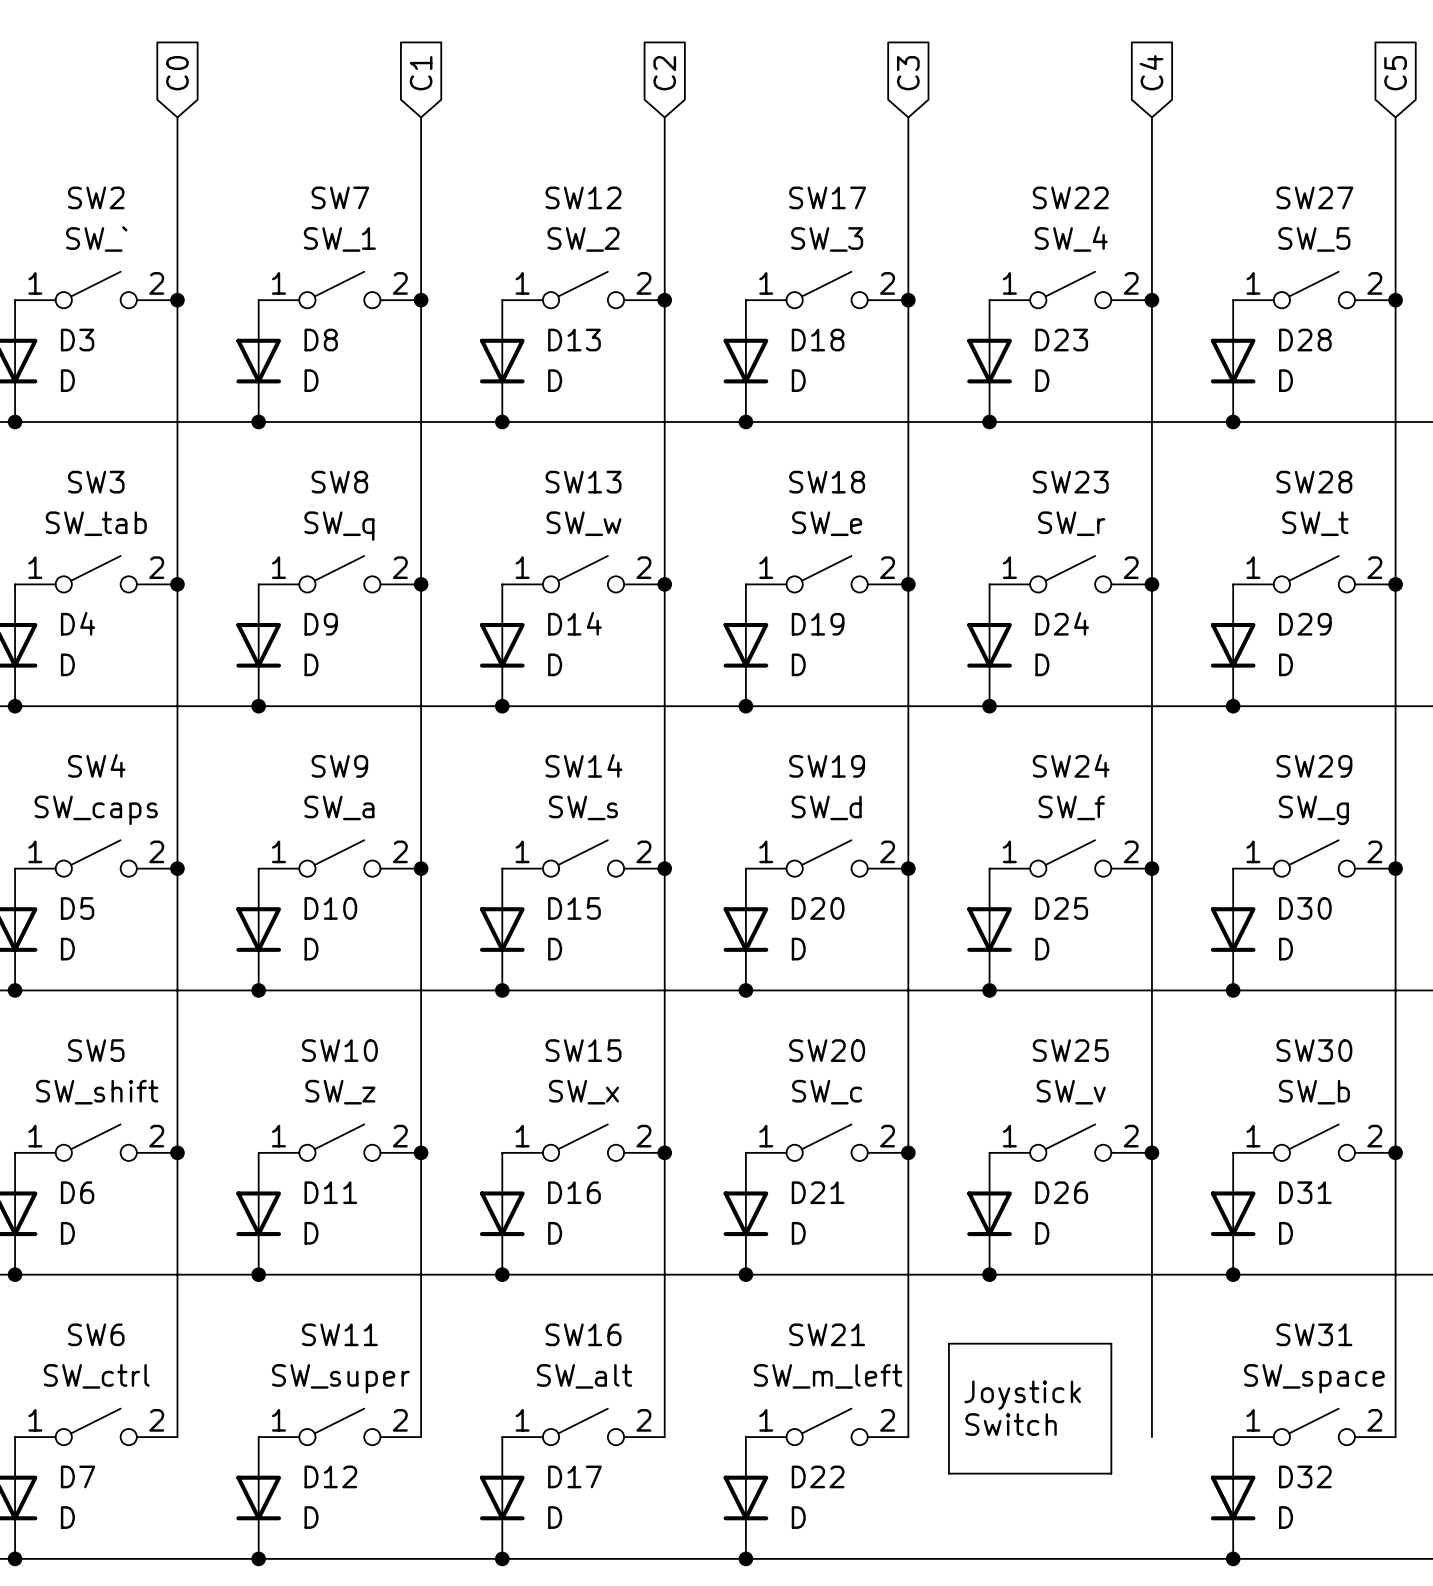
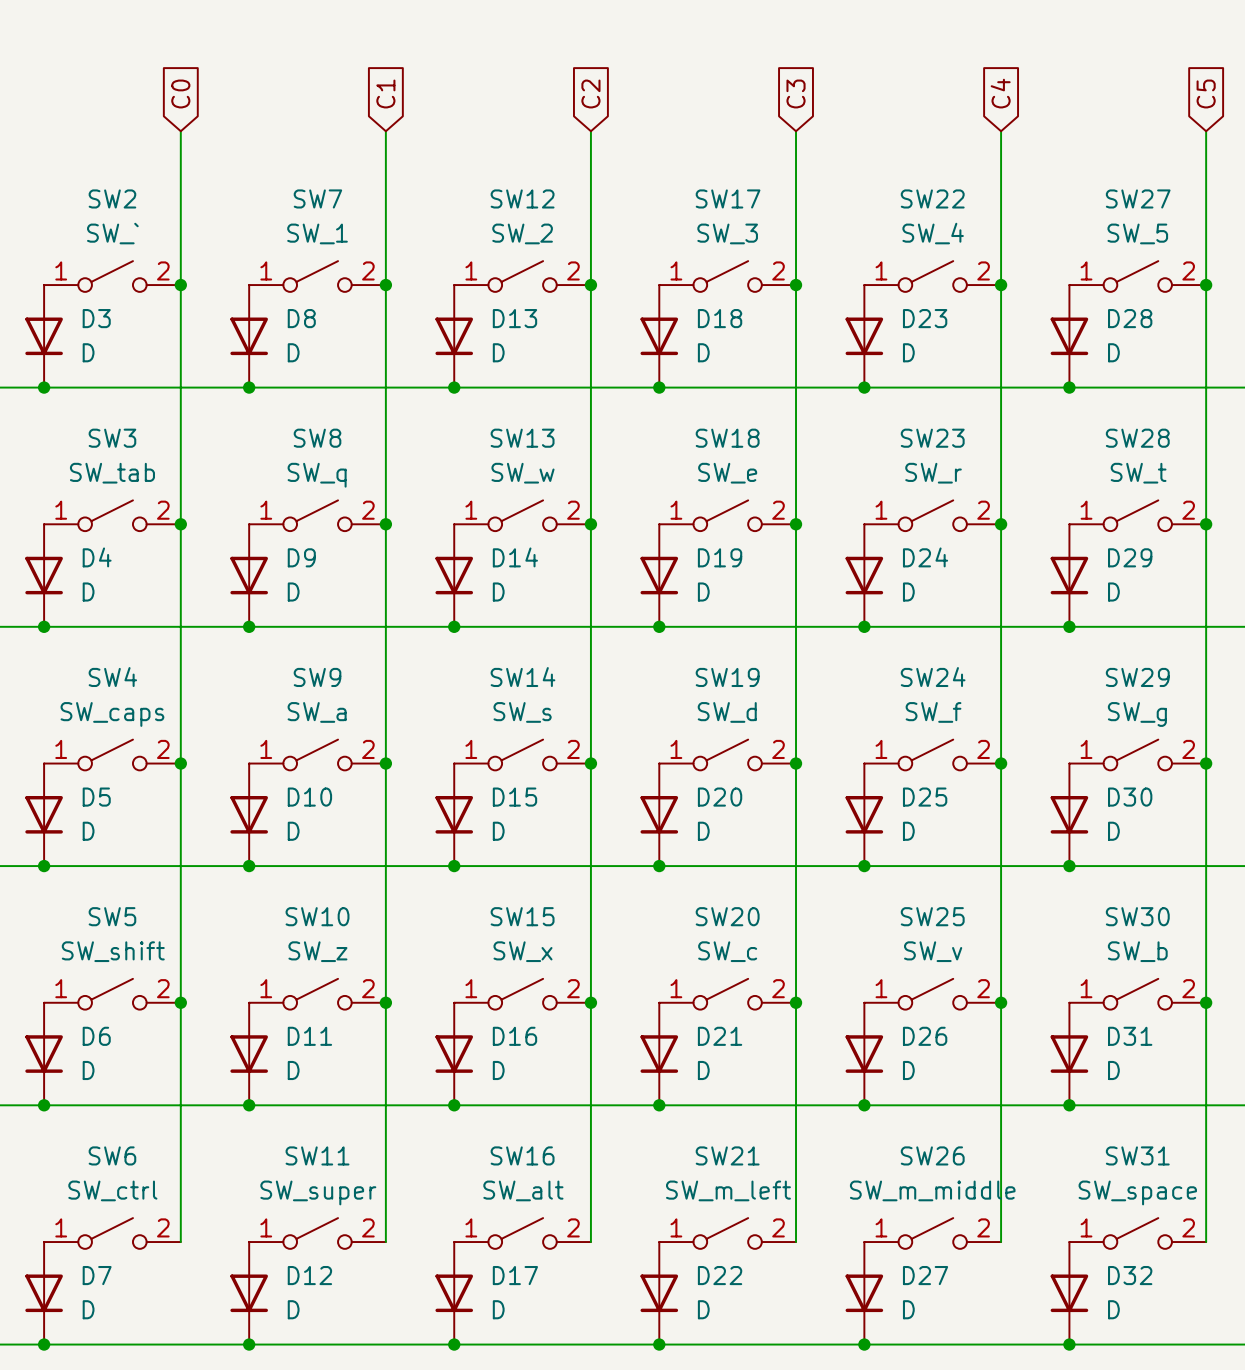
line: (948, 1343) (1111, 1343) (1111, 1473) (948, 1473) (948, 1343) -> none
text: Joystick (1022, 1395) -> none
text: Switch (1011, 1424) -> none
SW26: none -> SW_m_middle (932, 1233)
D27: none -> D (864, 1293)
junction: none -> (864, 1344)

